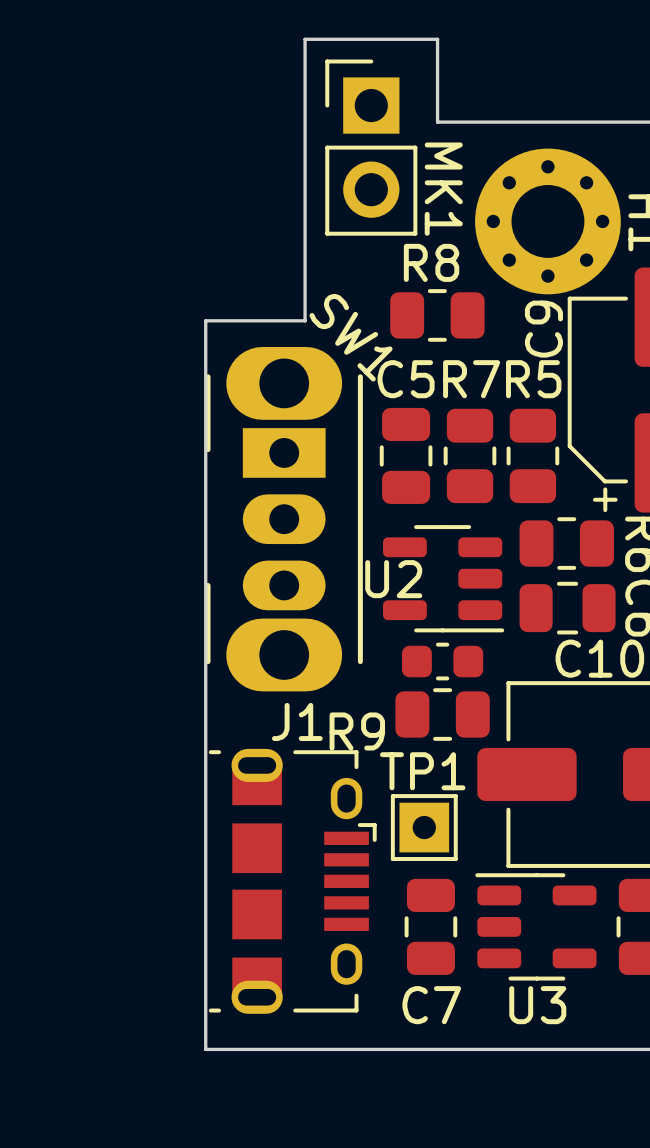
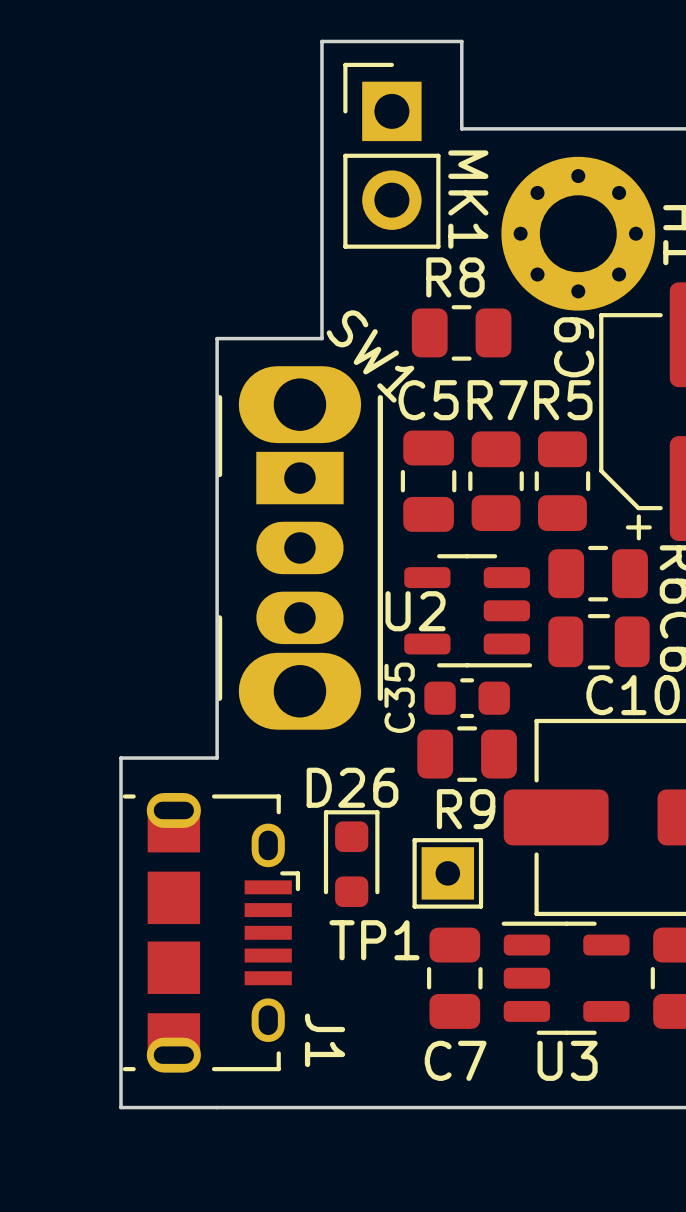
C35 name: none -> C35 (399, 697)
board edge: (205, 718) (205, 1049) -> (217, 758) (120, 758) (120, 1107) (217, 1107)
J1 name rotation: 0° (297, 721) -> 90° clockwise (325, 1040)
J1 name position: J1 (297, 721) -> J1 (325, 1040)
R9 name position: R9 (357, 731) -> R9 (466, 809)
TP1 name position: TP1 (422, 771) -> TP1 (374, 940)
D26: none -> (351, 858)
J1 position: (292, 881) -> (211, 932)

